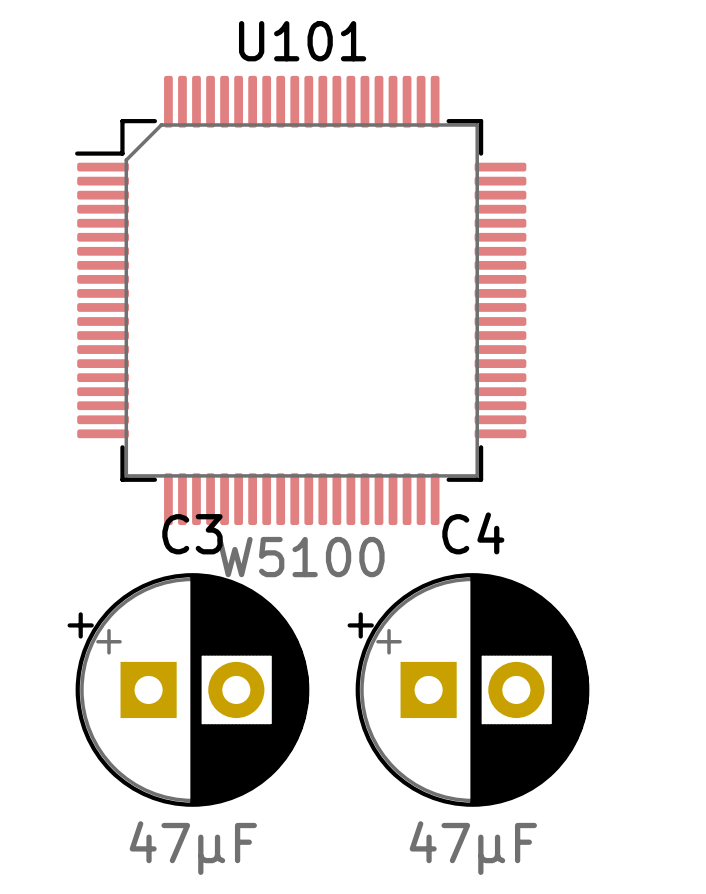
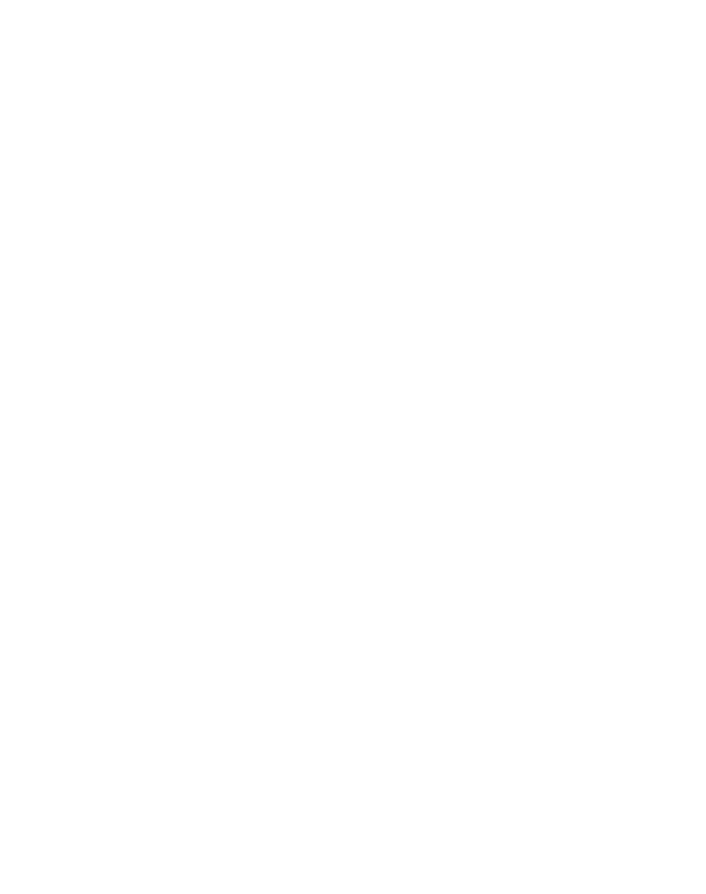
U101: W5100 (300, 300) -> none
C3: 47µF (188, 689) -> none
C4: 47µF (468, 689) -> none

